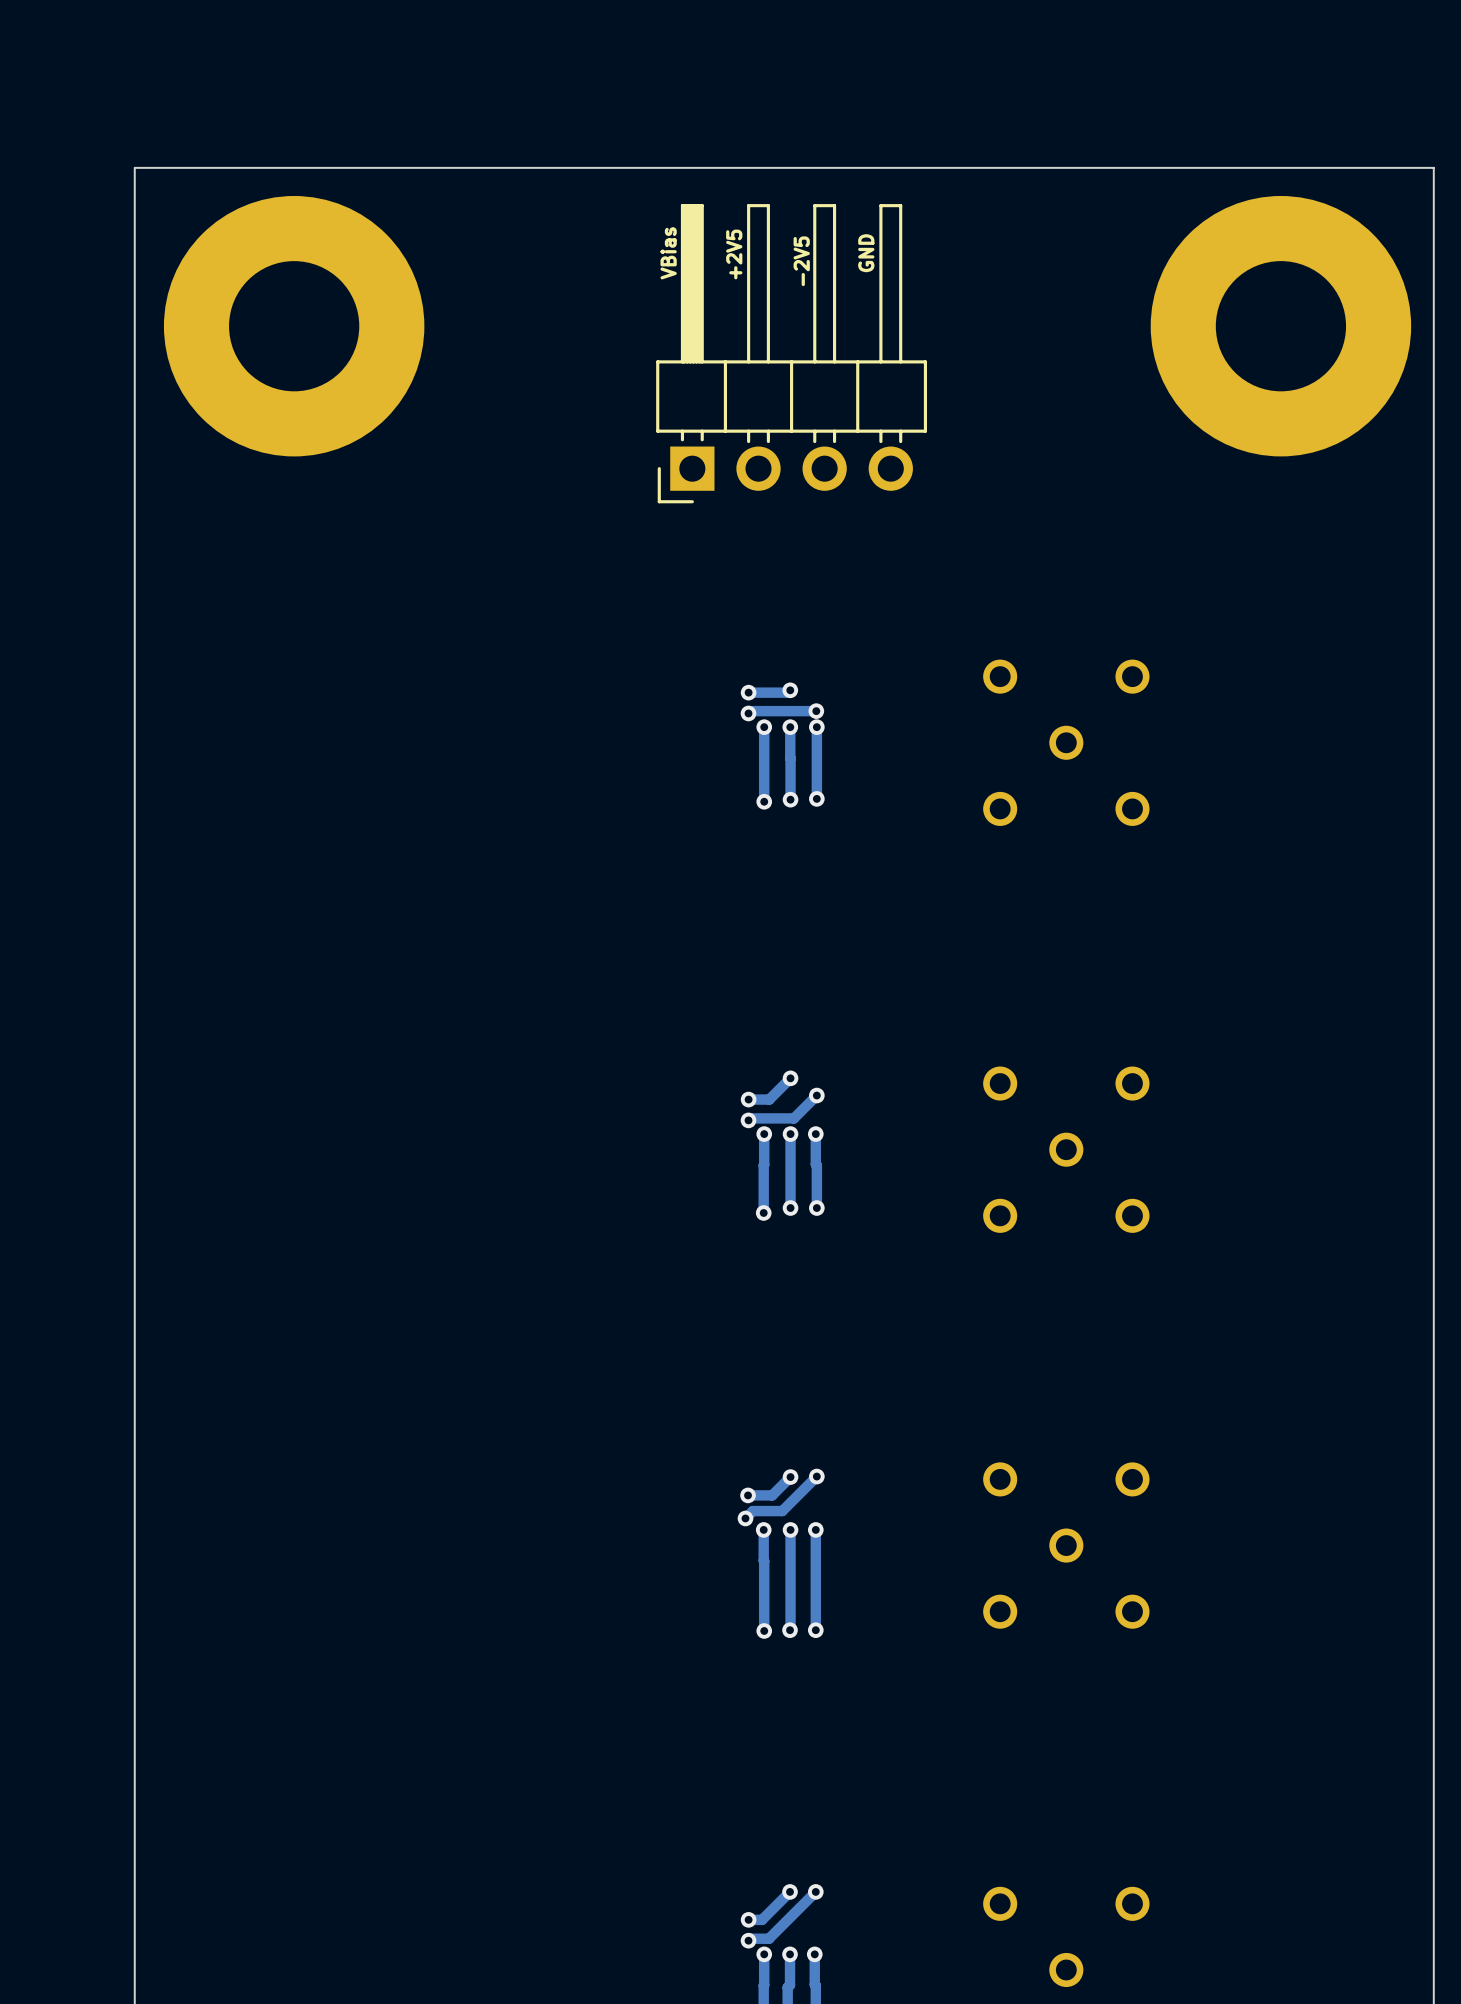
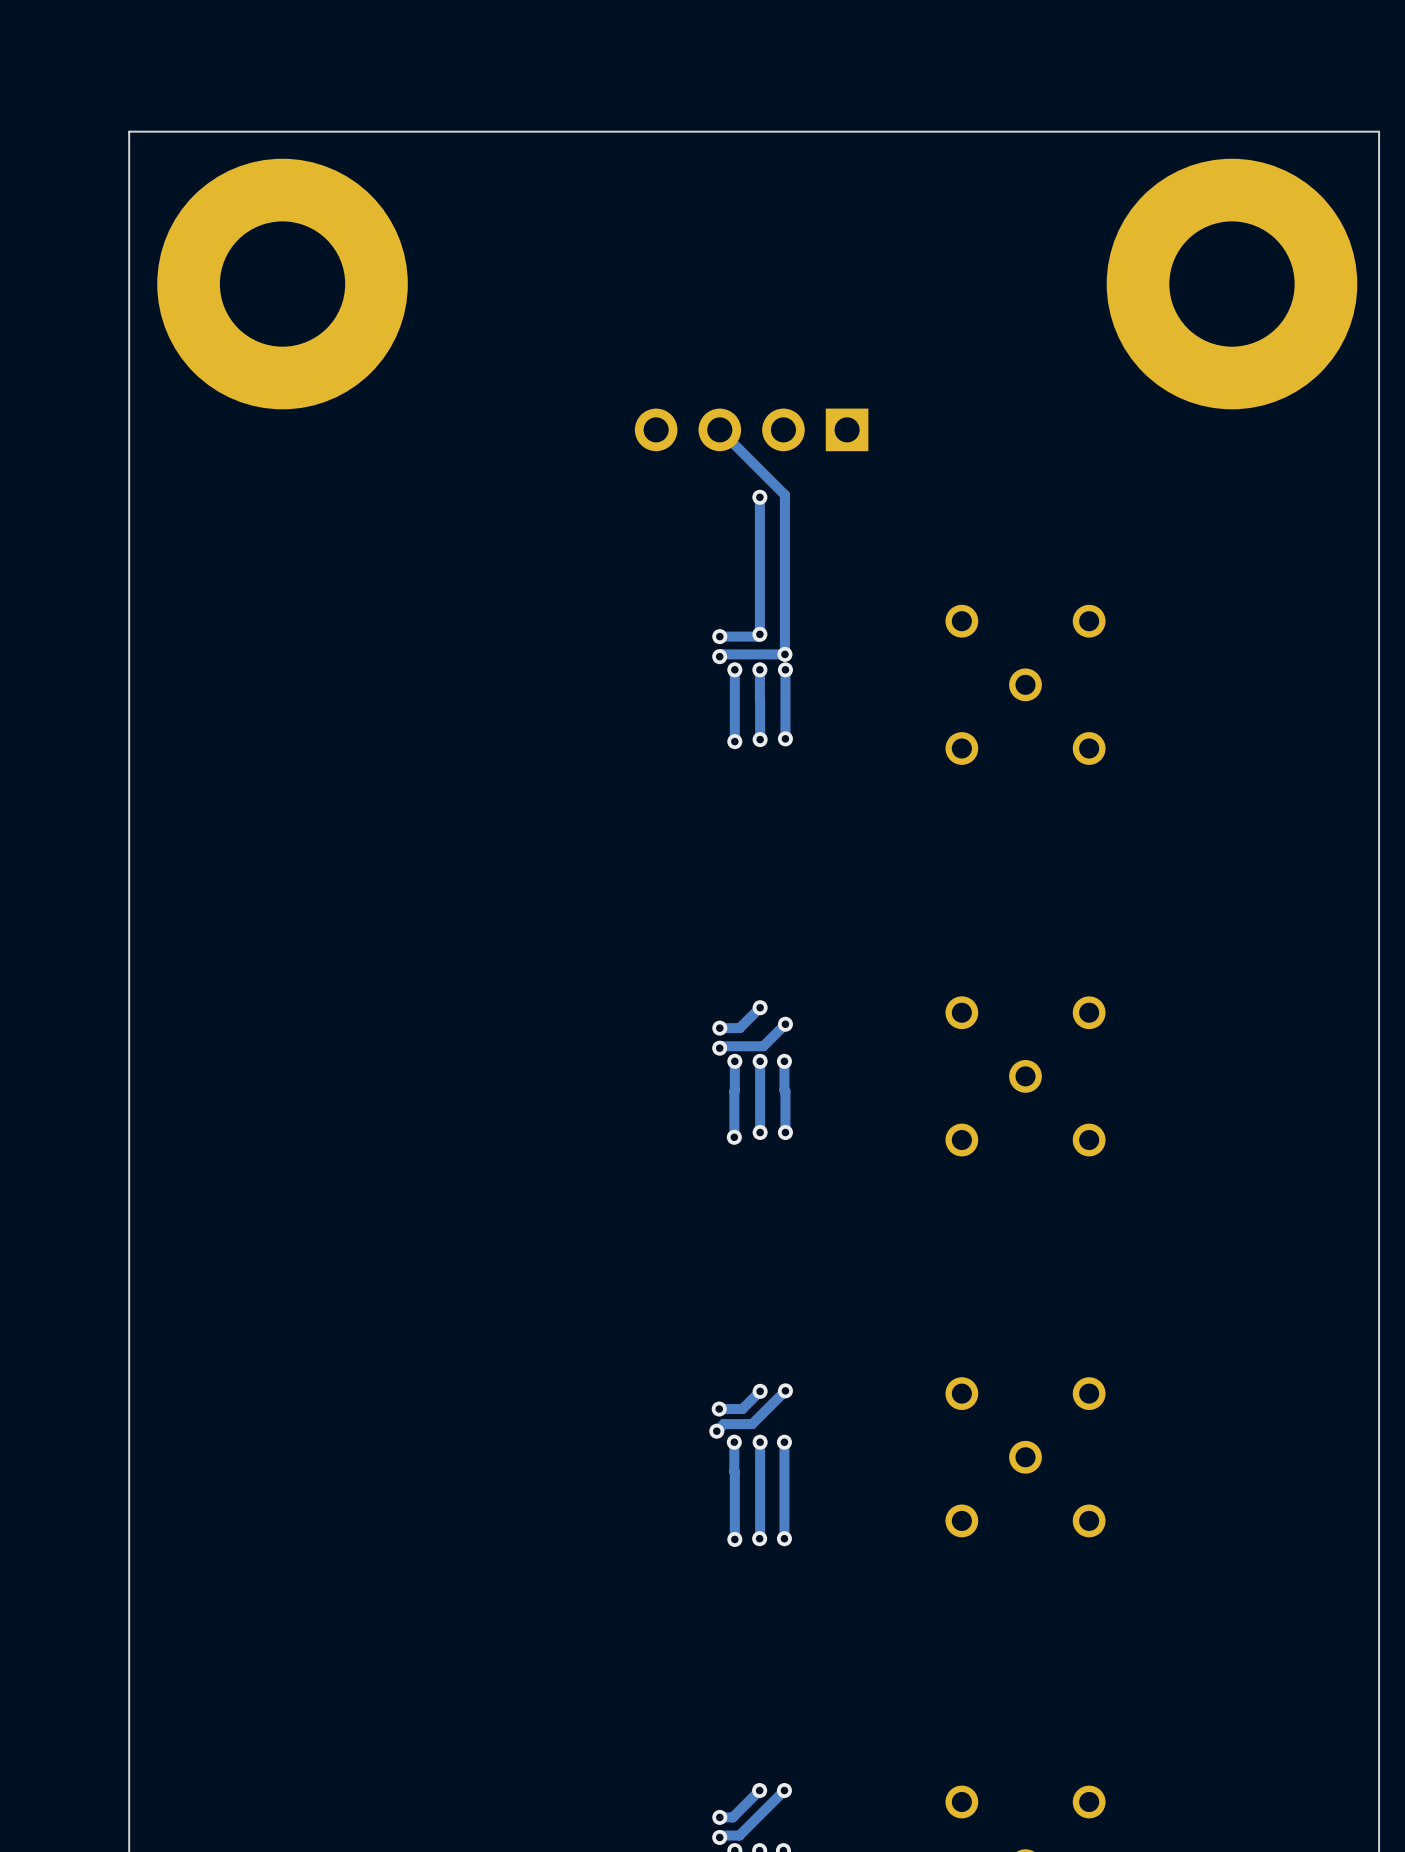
text: VBias (668, 253) -> none
text: GND (866, 253) -> none
text: +2V5 (734, 254) -> none
text: -2V5 (801, 261) -> none
part side: bottom (791, 353) -> top (751, 429)
track: none -> (719, 429) (784, 495) (784, 654)
track: none -> (759, 497) (759, 634)
via: none -> (759, 497)

